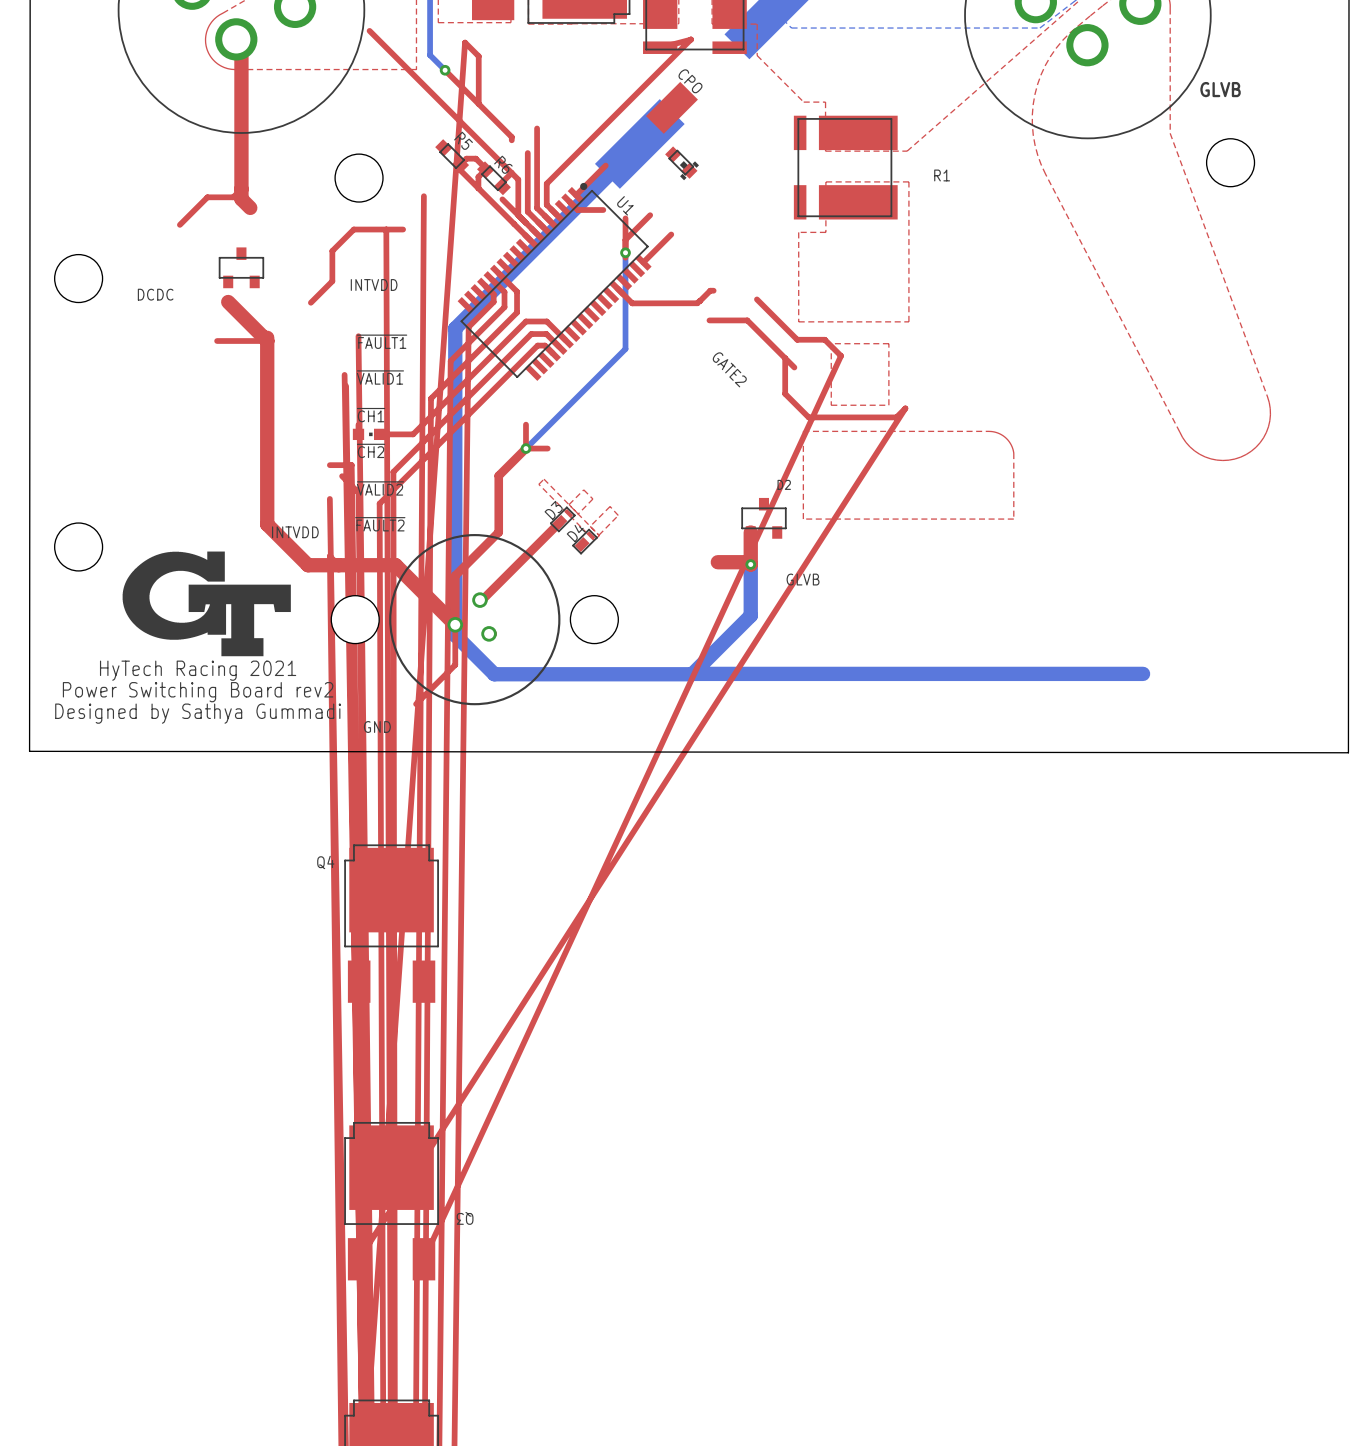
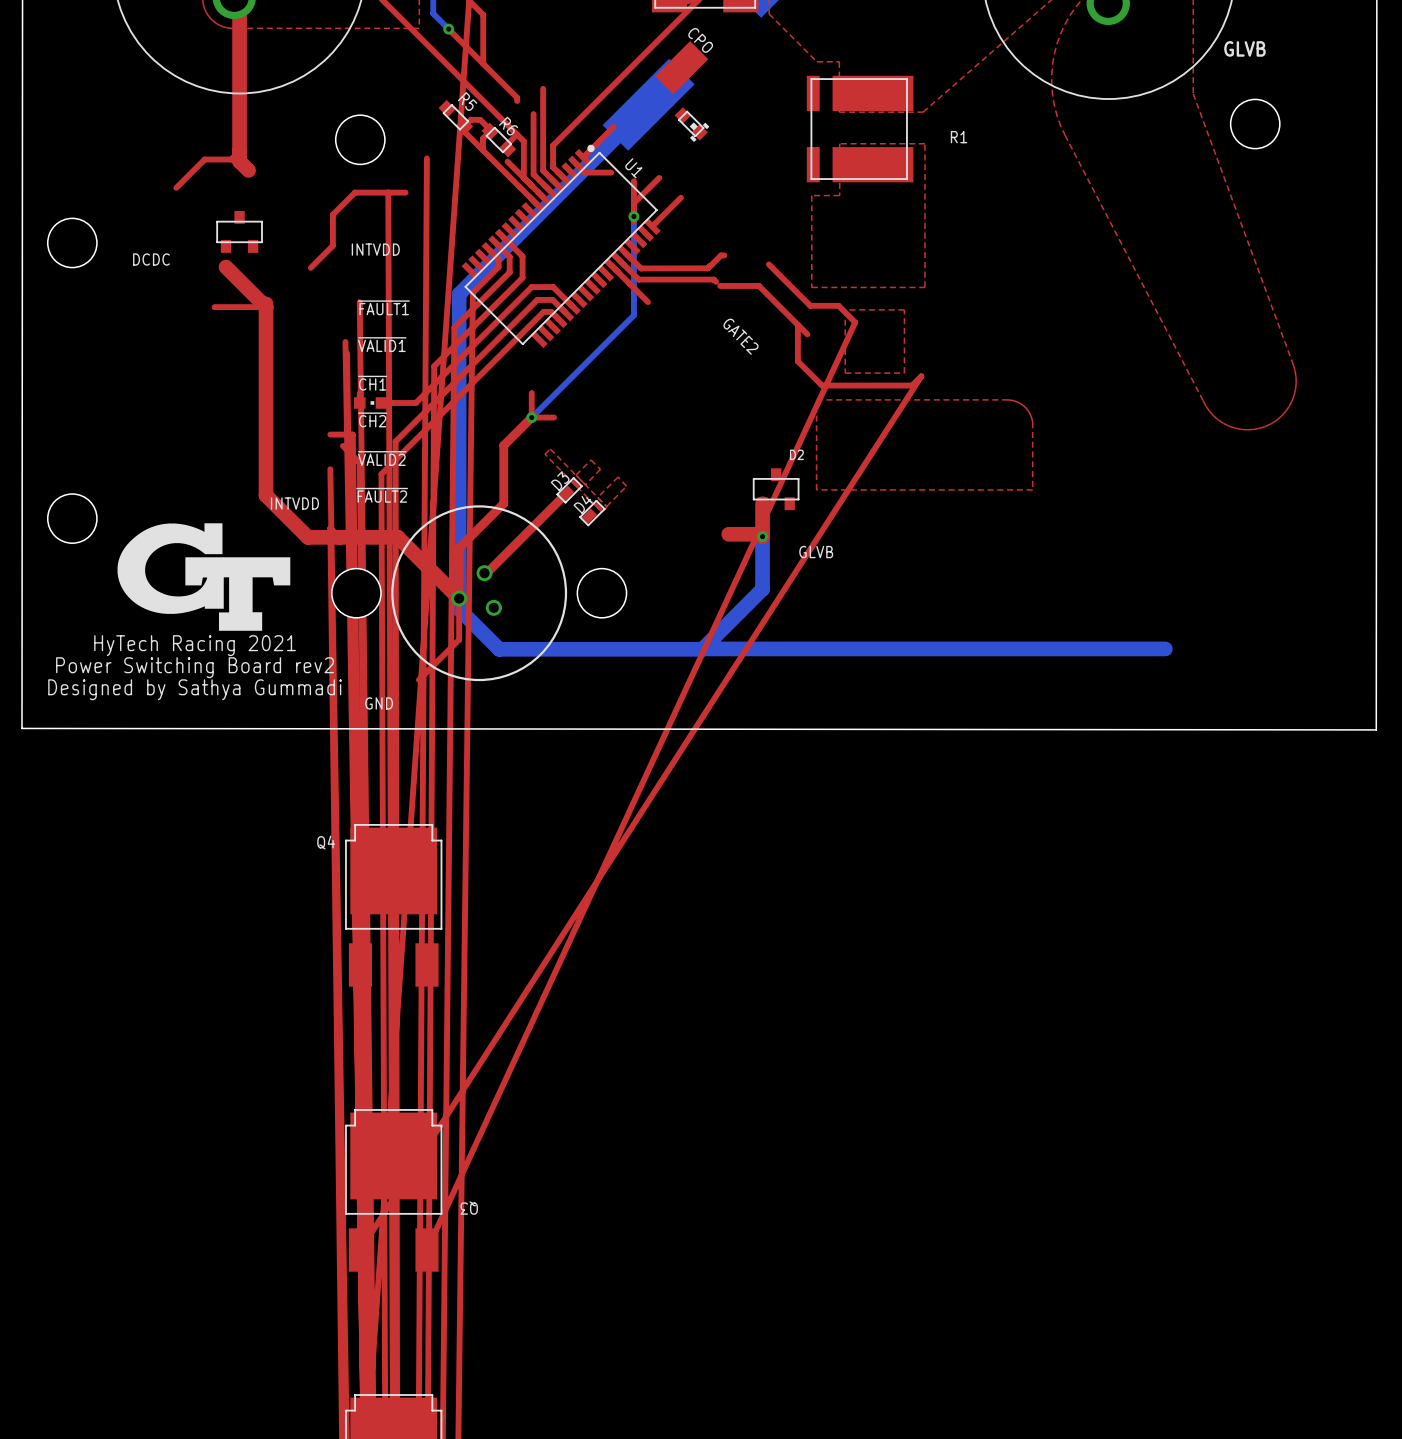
top track: none -> (618, 259) (638, 279) (713, 279) (715, 281)
top track: none -> (612, 266) (647, 302)

